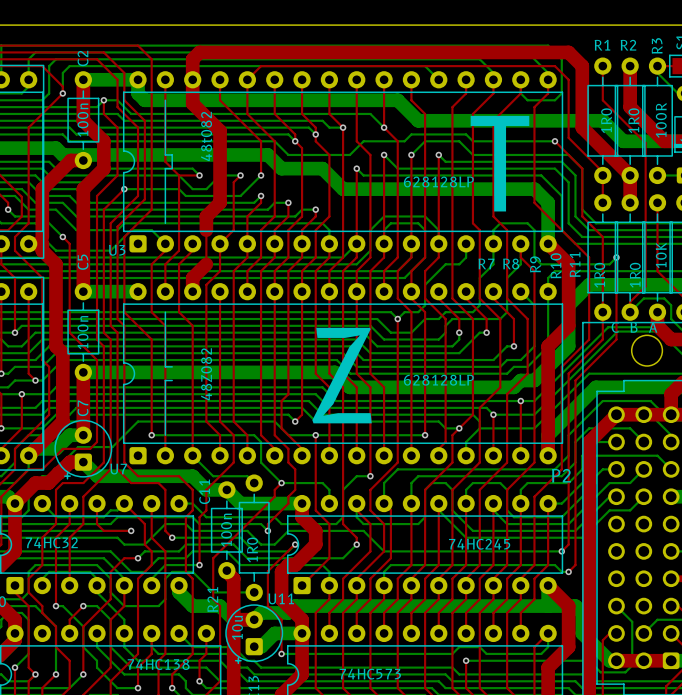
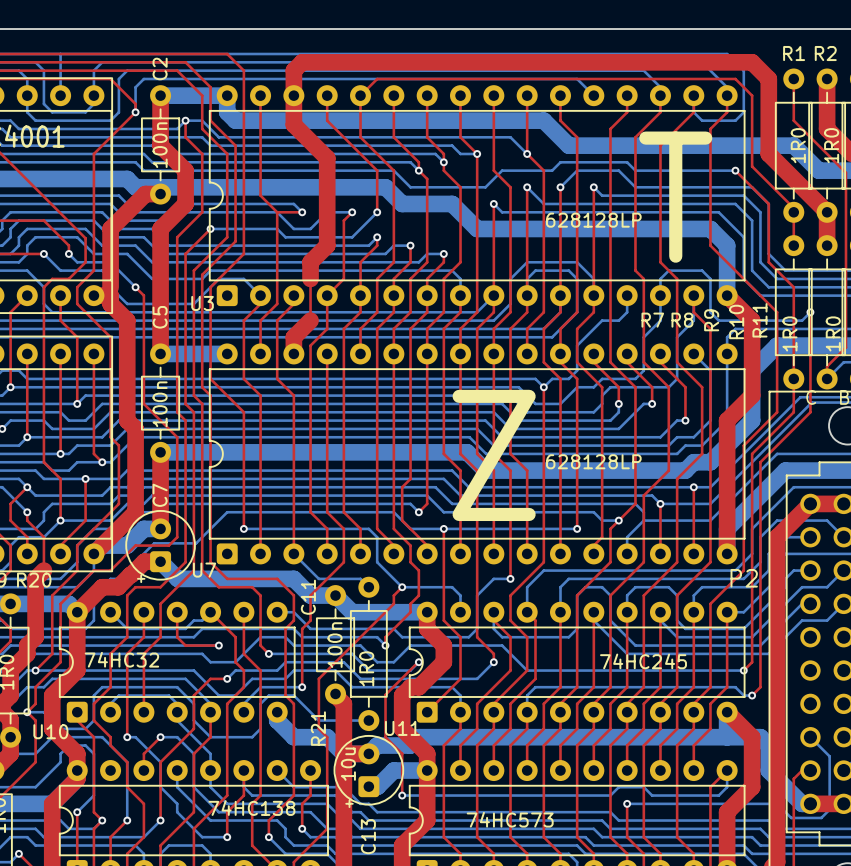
line: (165, 100) (165, 154) (172, 154) (172, 168) (165, 168) (165, 223) -> none
text: 48t082 (206, 136) -> none
line: (165, 312) (165, 366) (172, 366) -> none
text: 48Z082 (206, 374) -> none
line: (172, 380) (165, 380) (165, 435) -> none

